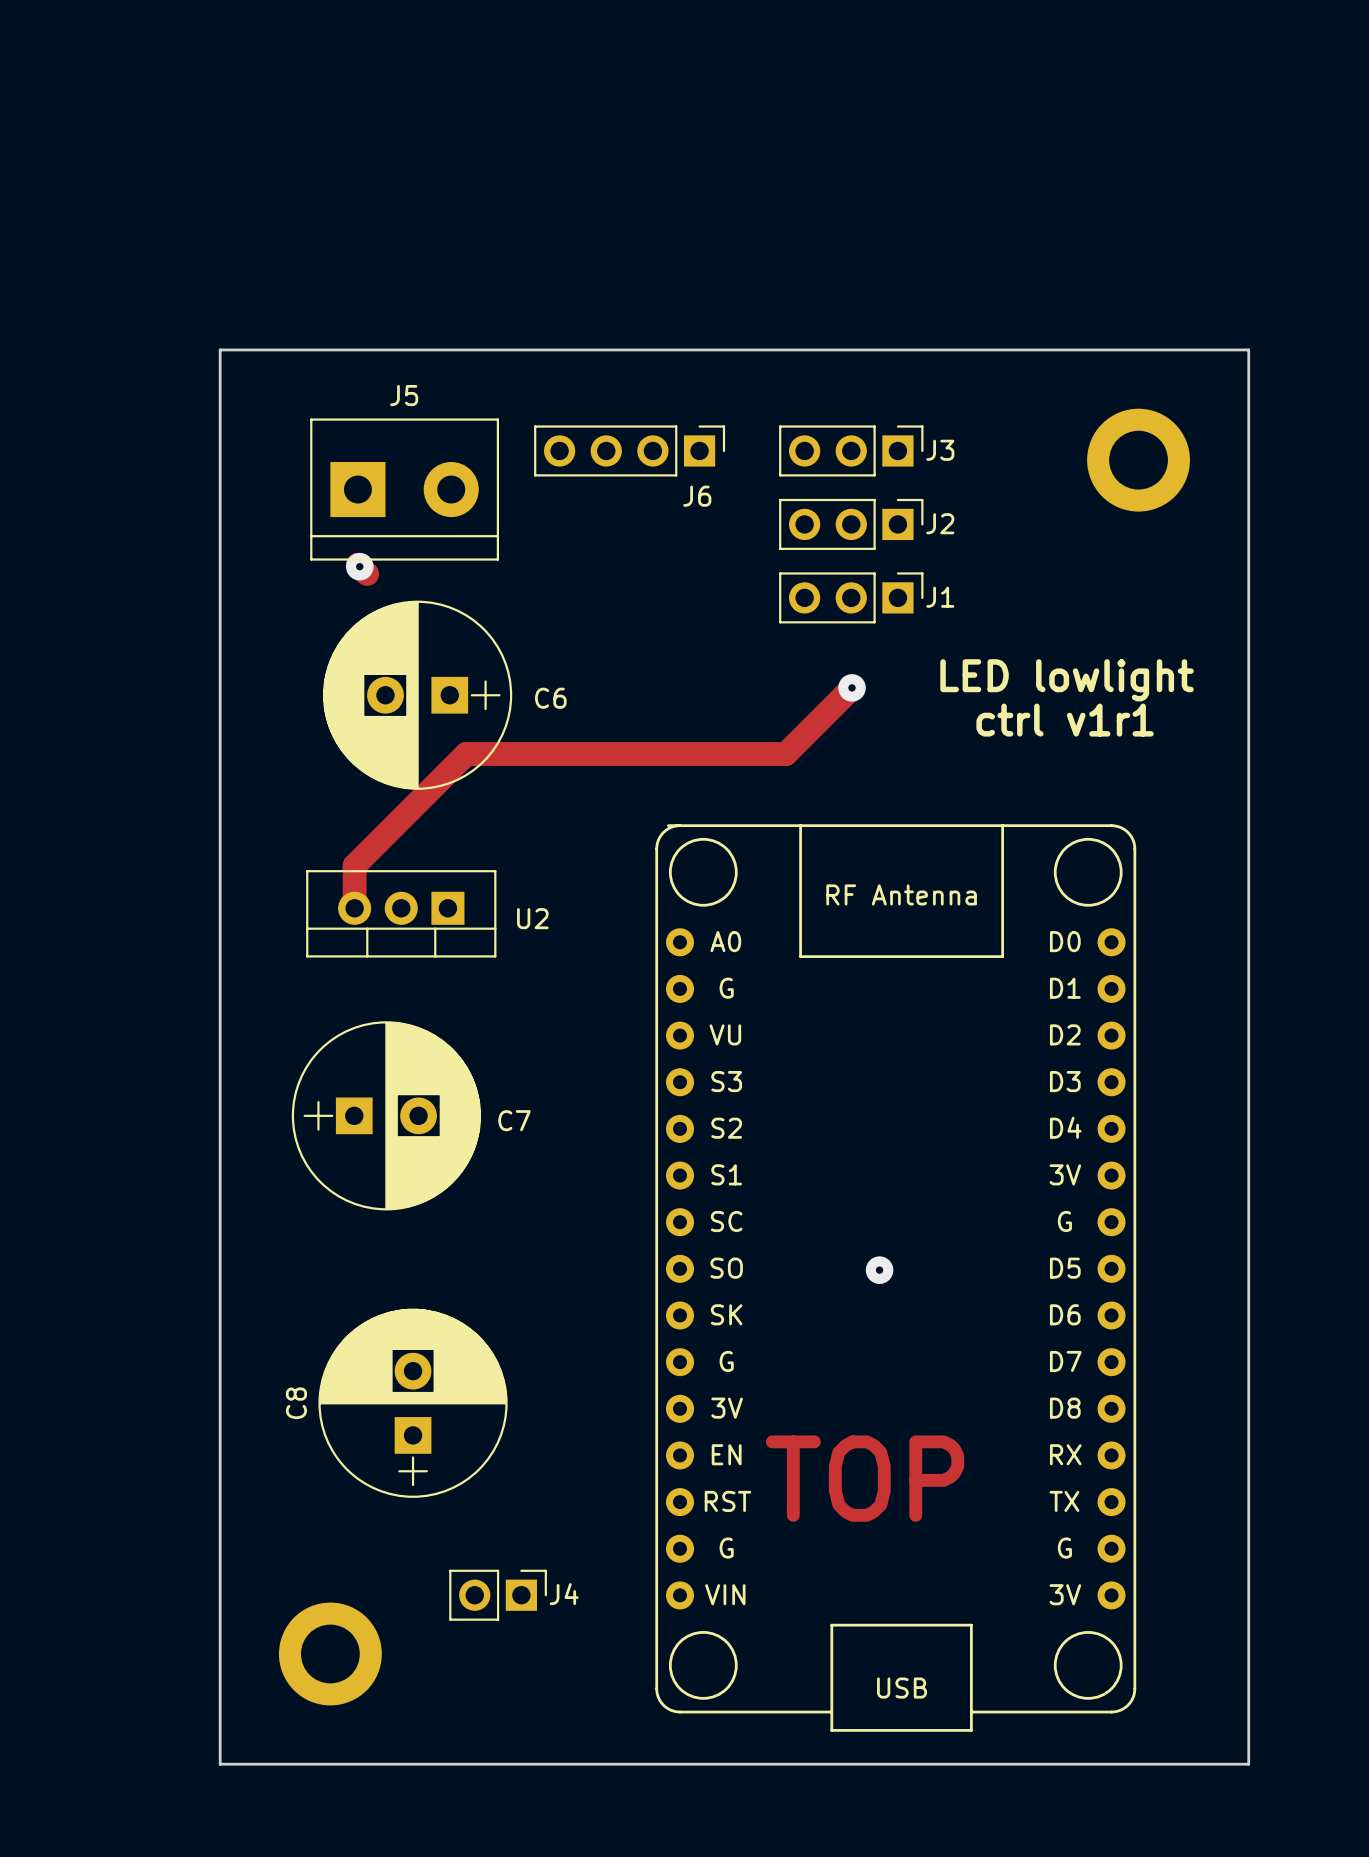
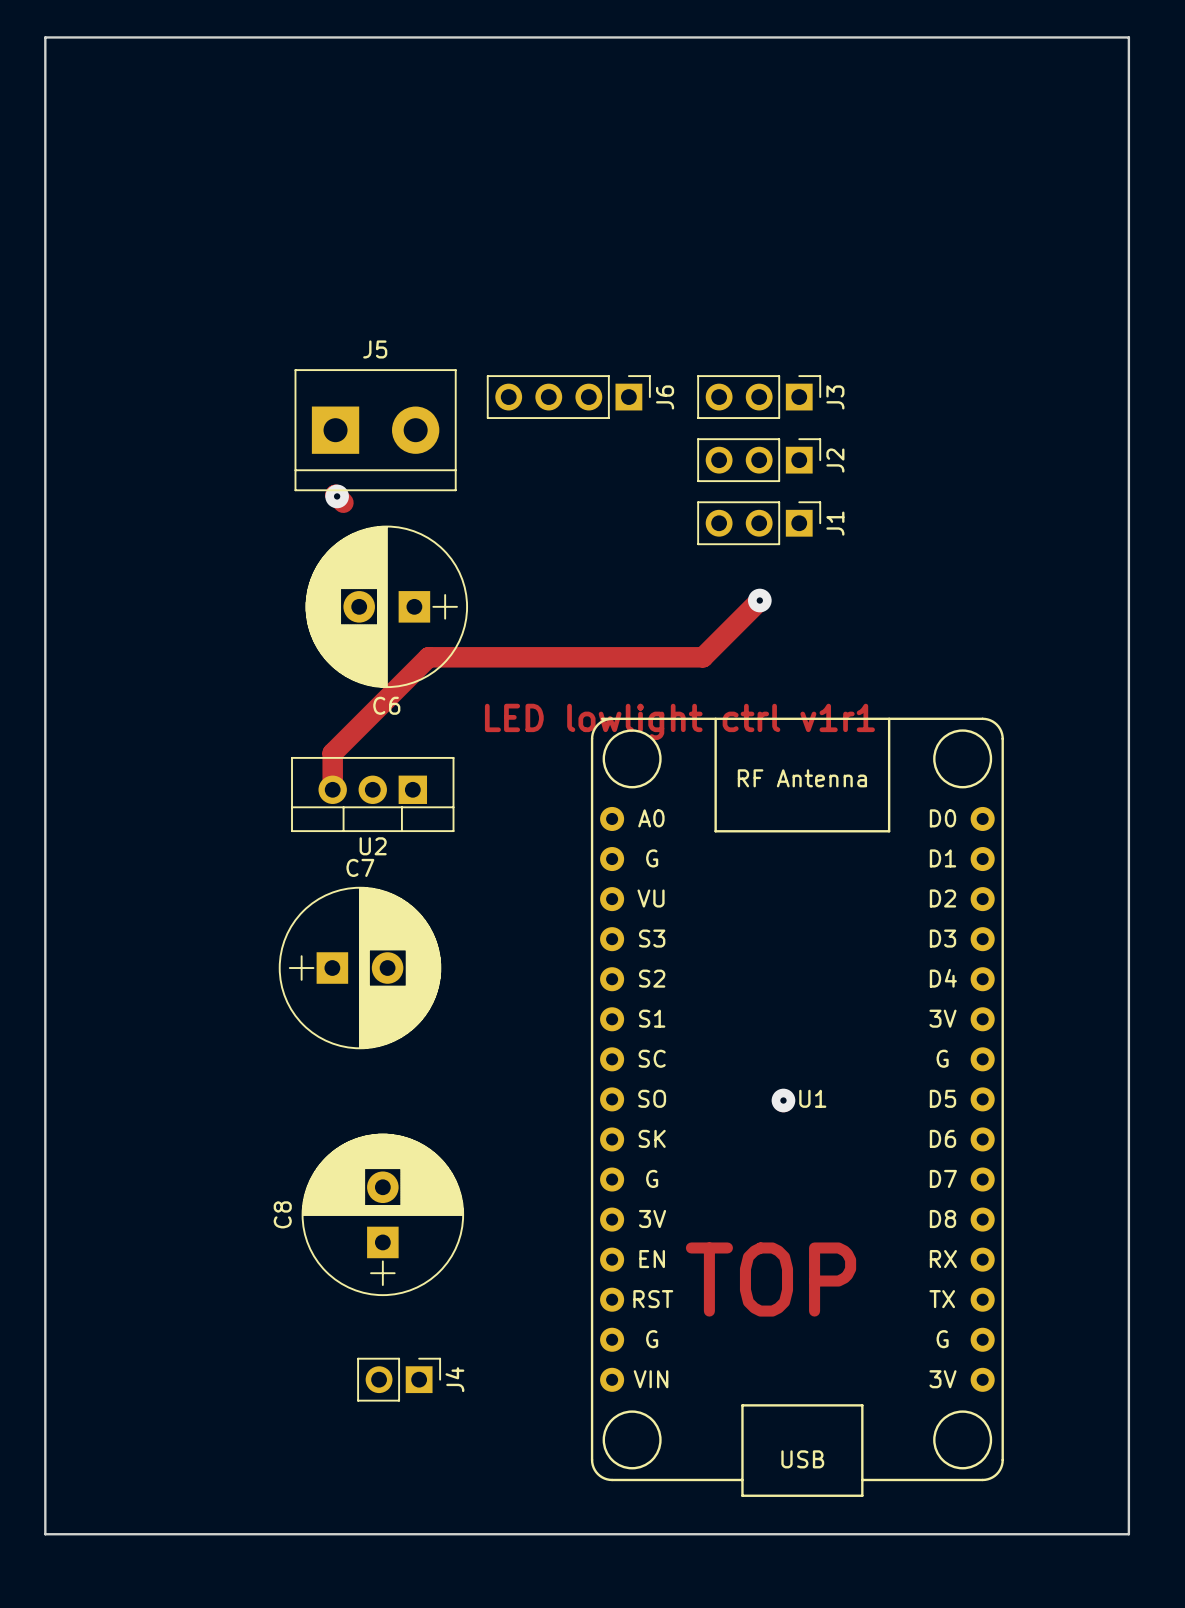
board edge: (220, 349) (1248, 349) (1248, 1764) (220, 1764) (220, 349) -> (45, 37) (45, 1534) (1128, 1534) (1128, 37) (45, 37)
J3 name rotation: 0° (940, 450) -> 90° counterclockwise (835, 397)
part: (1138, 460) -> none
J6 name rotation: 0° (697, 496) -> 90° counterclockwise (665, 397)
J6 name position: J6 (697, 496) -> J6 (665, 397)
J2 name rotation: 0° (940, 523) -> 90° counterclockwise (835, 460)
J1 name rotation: 0° (940, 597) -> 90° counterclockwise (835, 523)
text: LED lowlight (1067, 680) -> none
C6 name position: C6 (550, 698) -> C6 (386, 705)
text: ctrl v1r1 (1065, 720) -> none
text: none -> LED lowlight ctrl v1r1 (679, 721)
U2 name position: U2 (532, 918) -> U2 (373, 846)
C7 name position: C7 (514, 1120) -> C7 (360, 867)
U1 name: none -> U1 (812, 1098)
J4 name rotation: 0° (564, 1594) -> 90° counterclockwise (454, 1379)
J4 position: (498, 1595) -> (399, 1379)
part: (330, 1654) -> none

